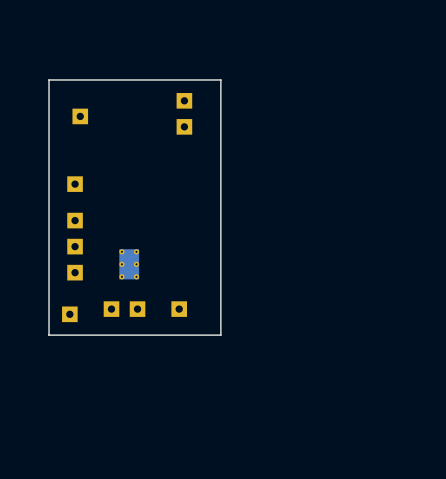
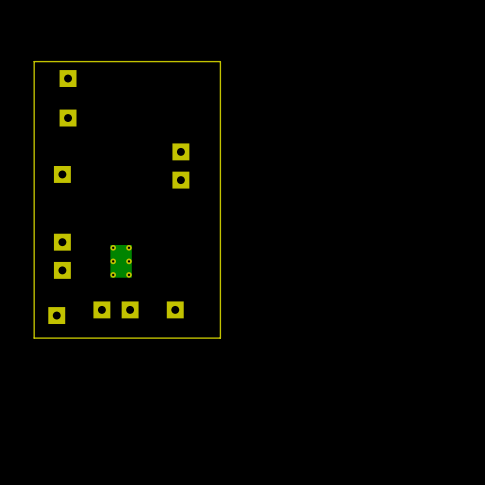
part: none -> (68, 78)
part: (184, 100) -> none
part: (80, 116) -> none
part: (184, 126) -> none
part: none -> (68, 118)
part: none -> (180, 151)
part: none -> (180, 180)
part: (75, 220) -> none

